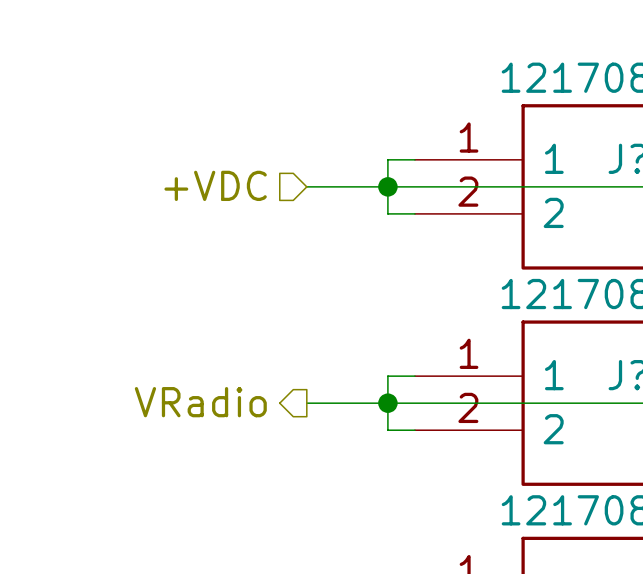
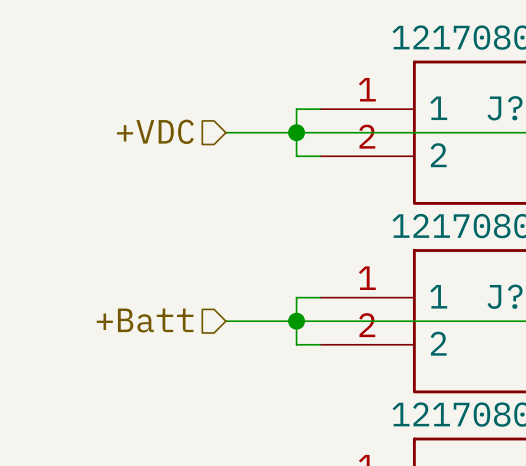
hierarchical label shape: output (200, 402) -> input (145, 320)
hierarchical label: VRadio (200, 402) -> +Batt (145, 320)

